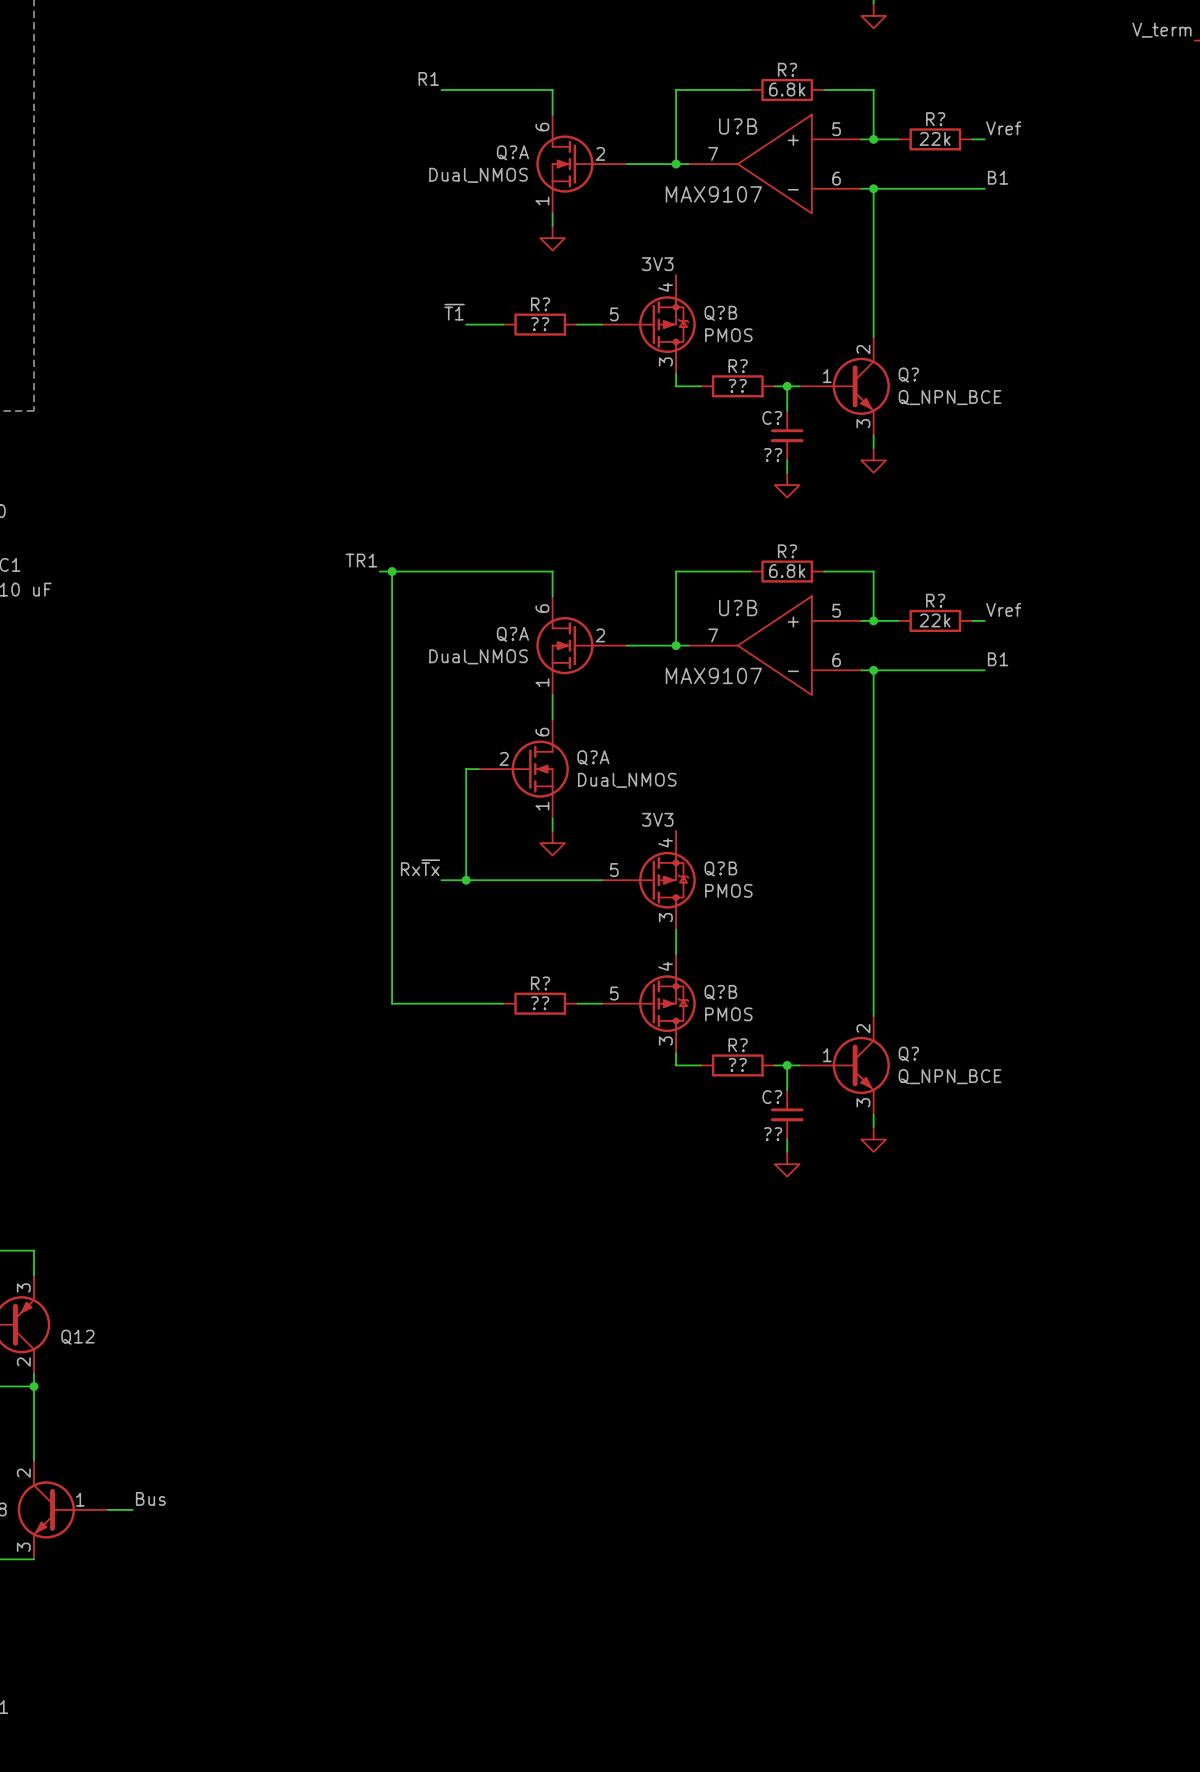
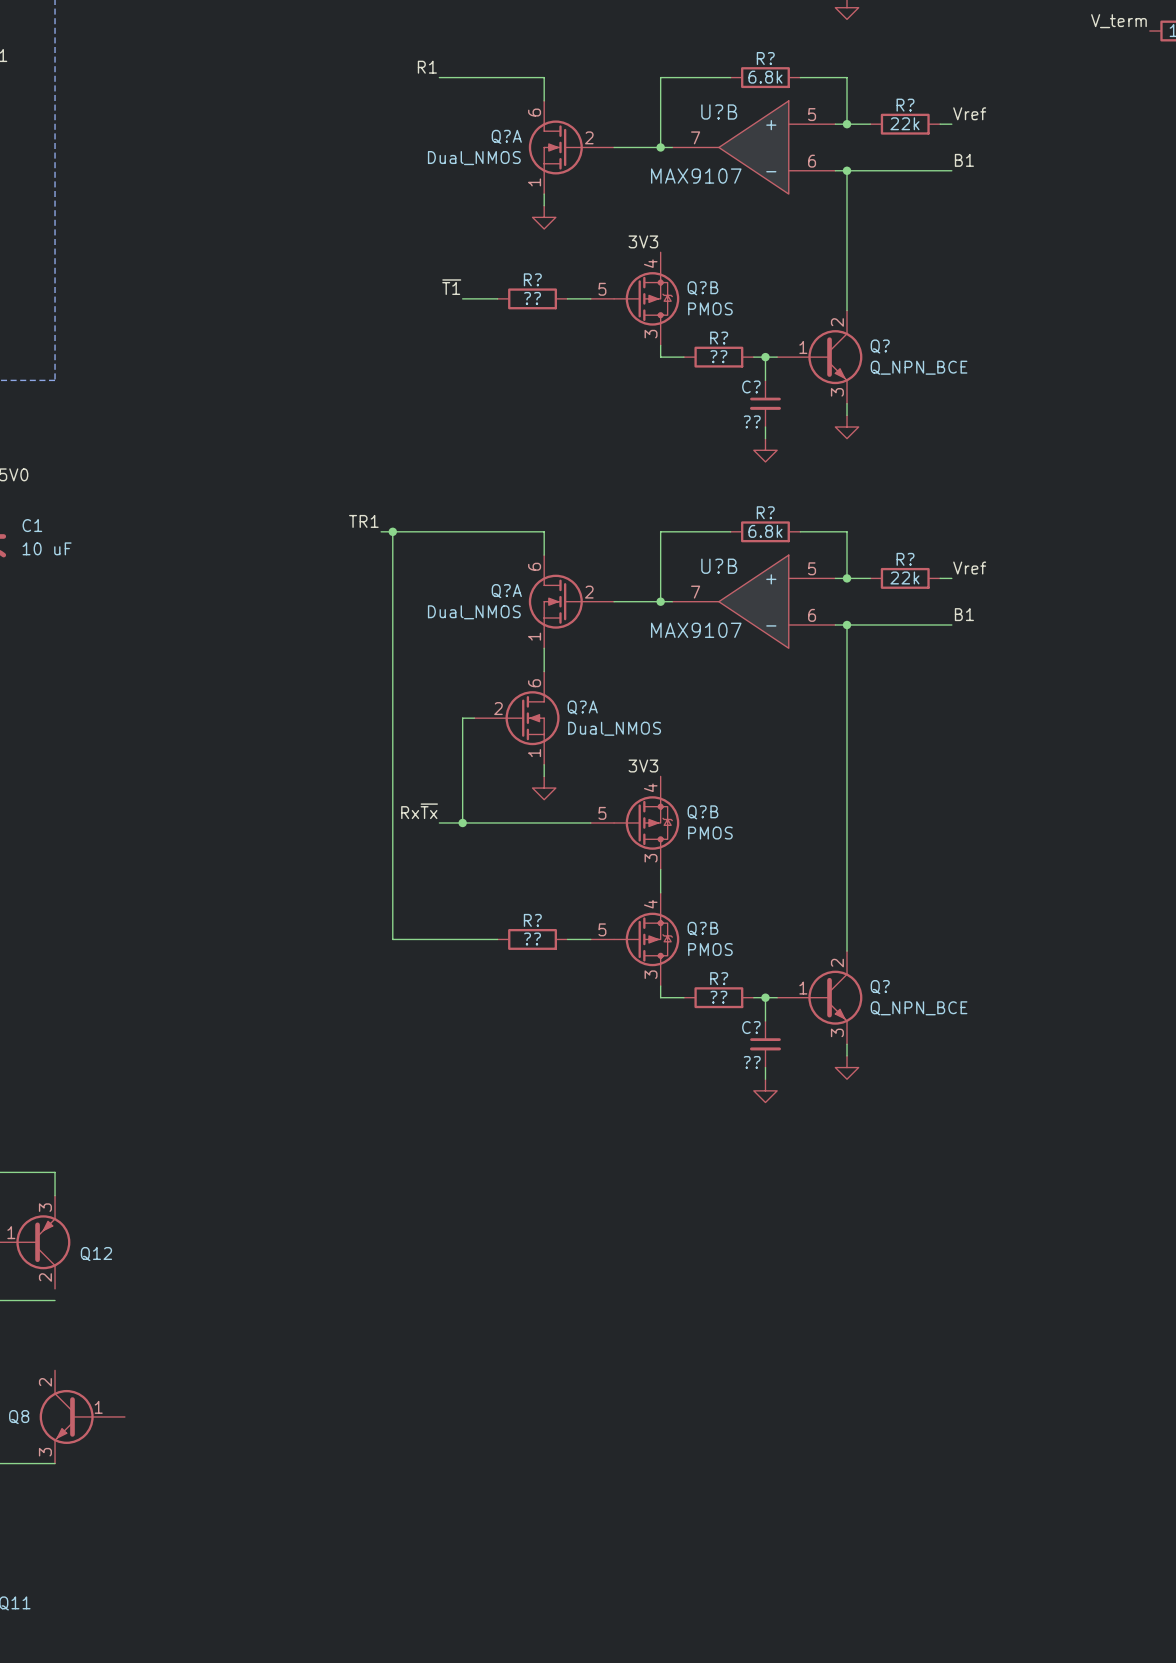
wire: (34, 1374) (34, 1460) -> none
junction: (34, 1386) -> none
label: Bus (150, 1498) -> none
wire: (108, 1509) (132, 1509) -> none

